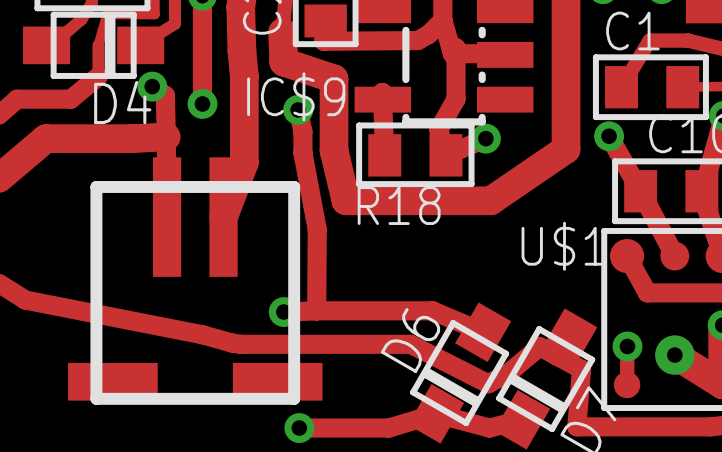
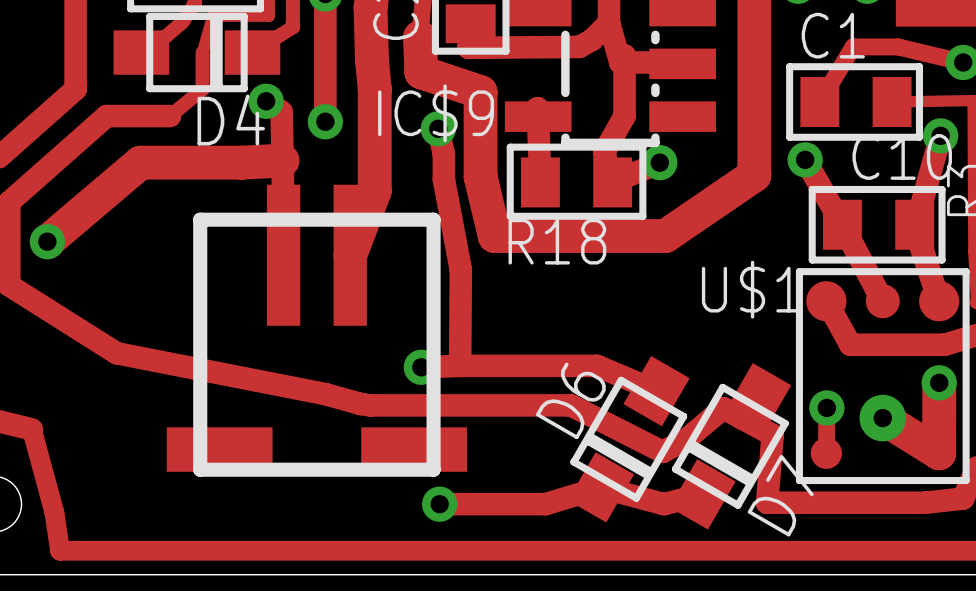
track width: thick (98, 76) (70, 99) -> thin (202, 89) (170, 116)

